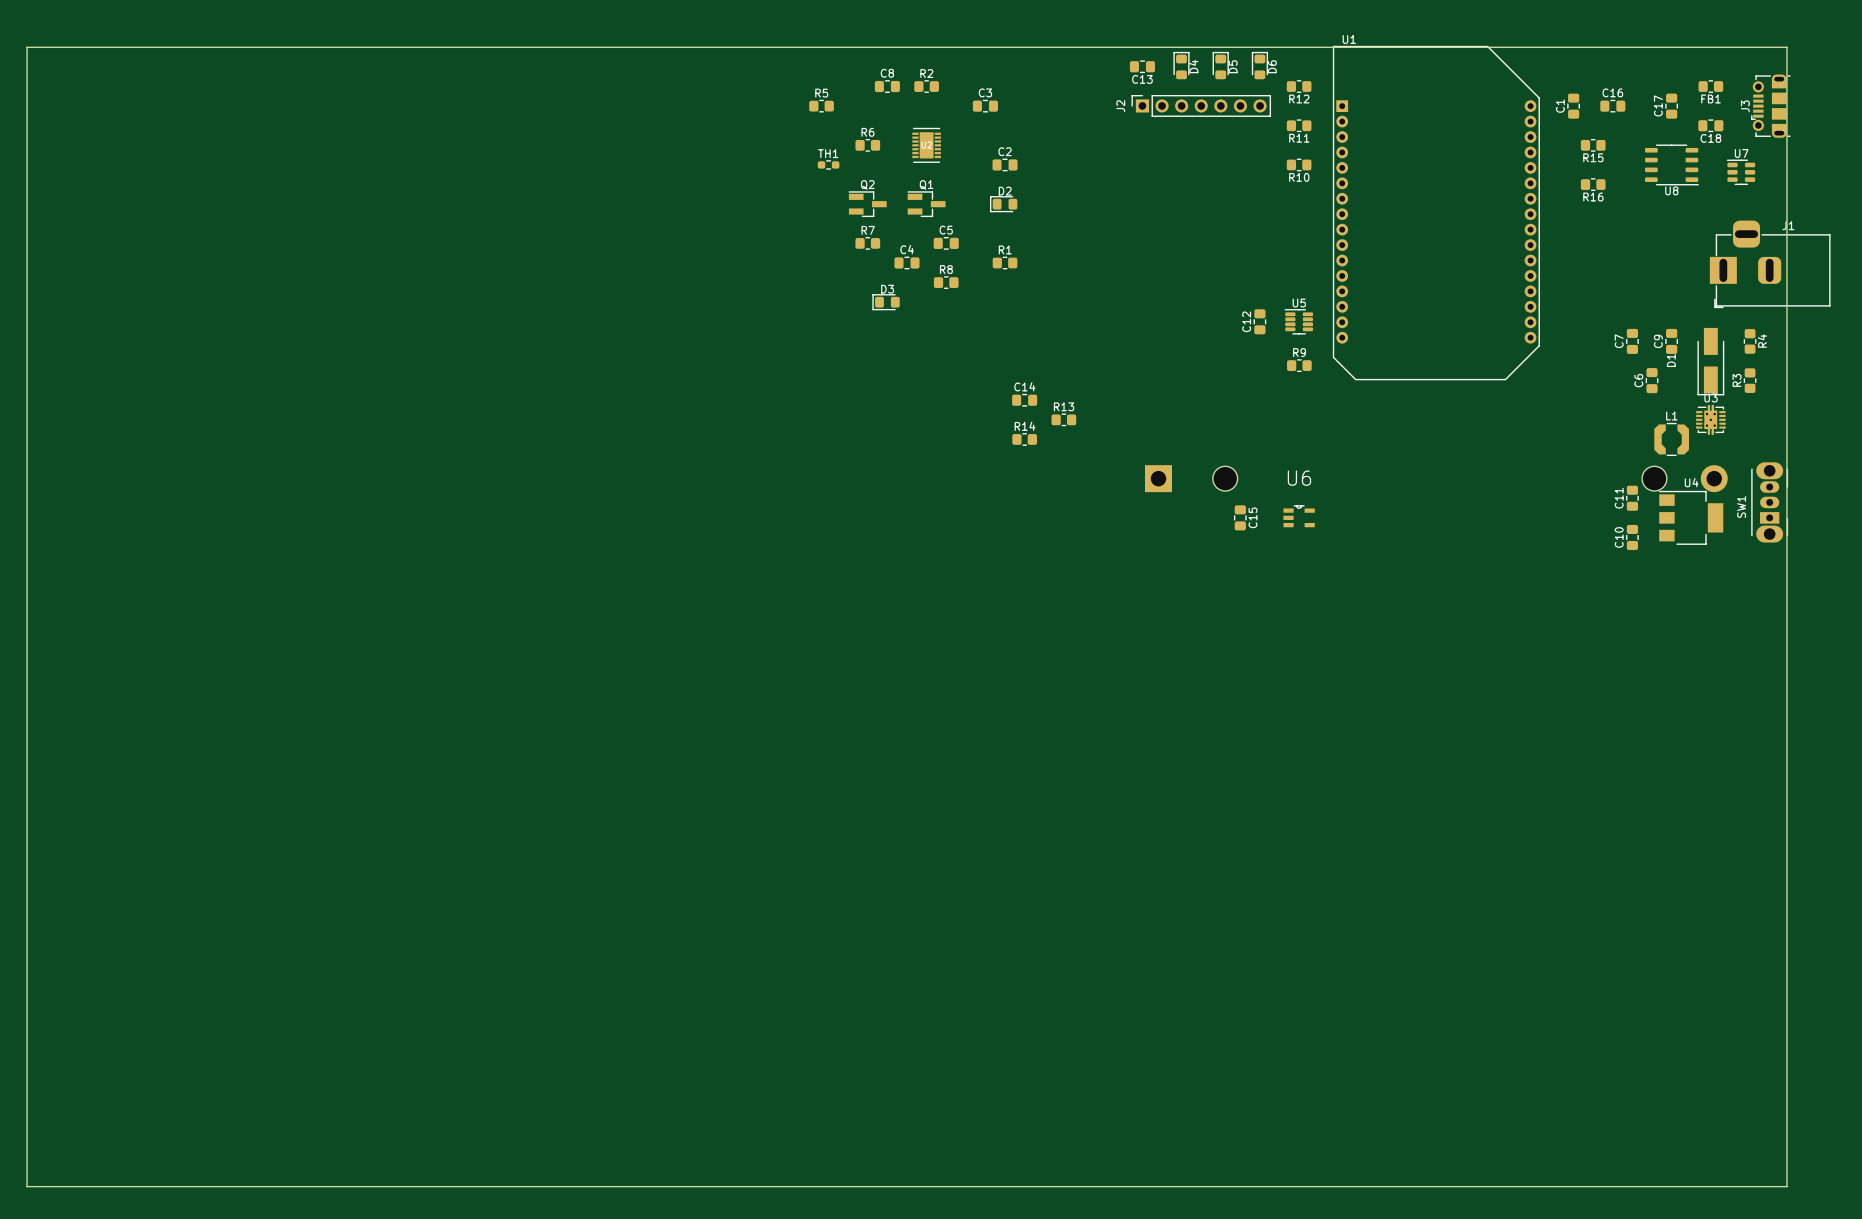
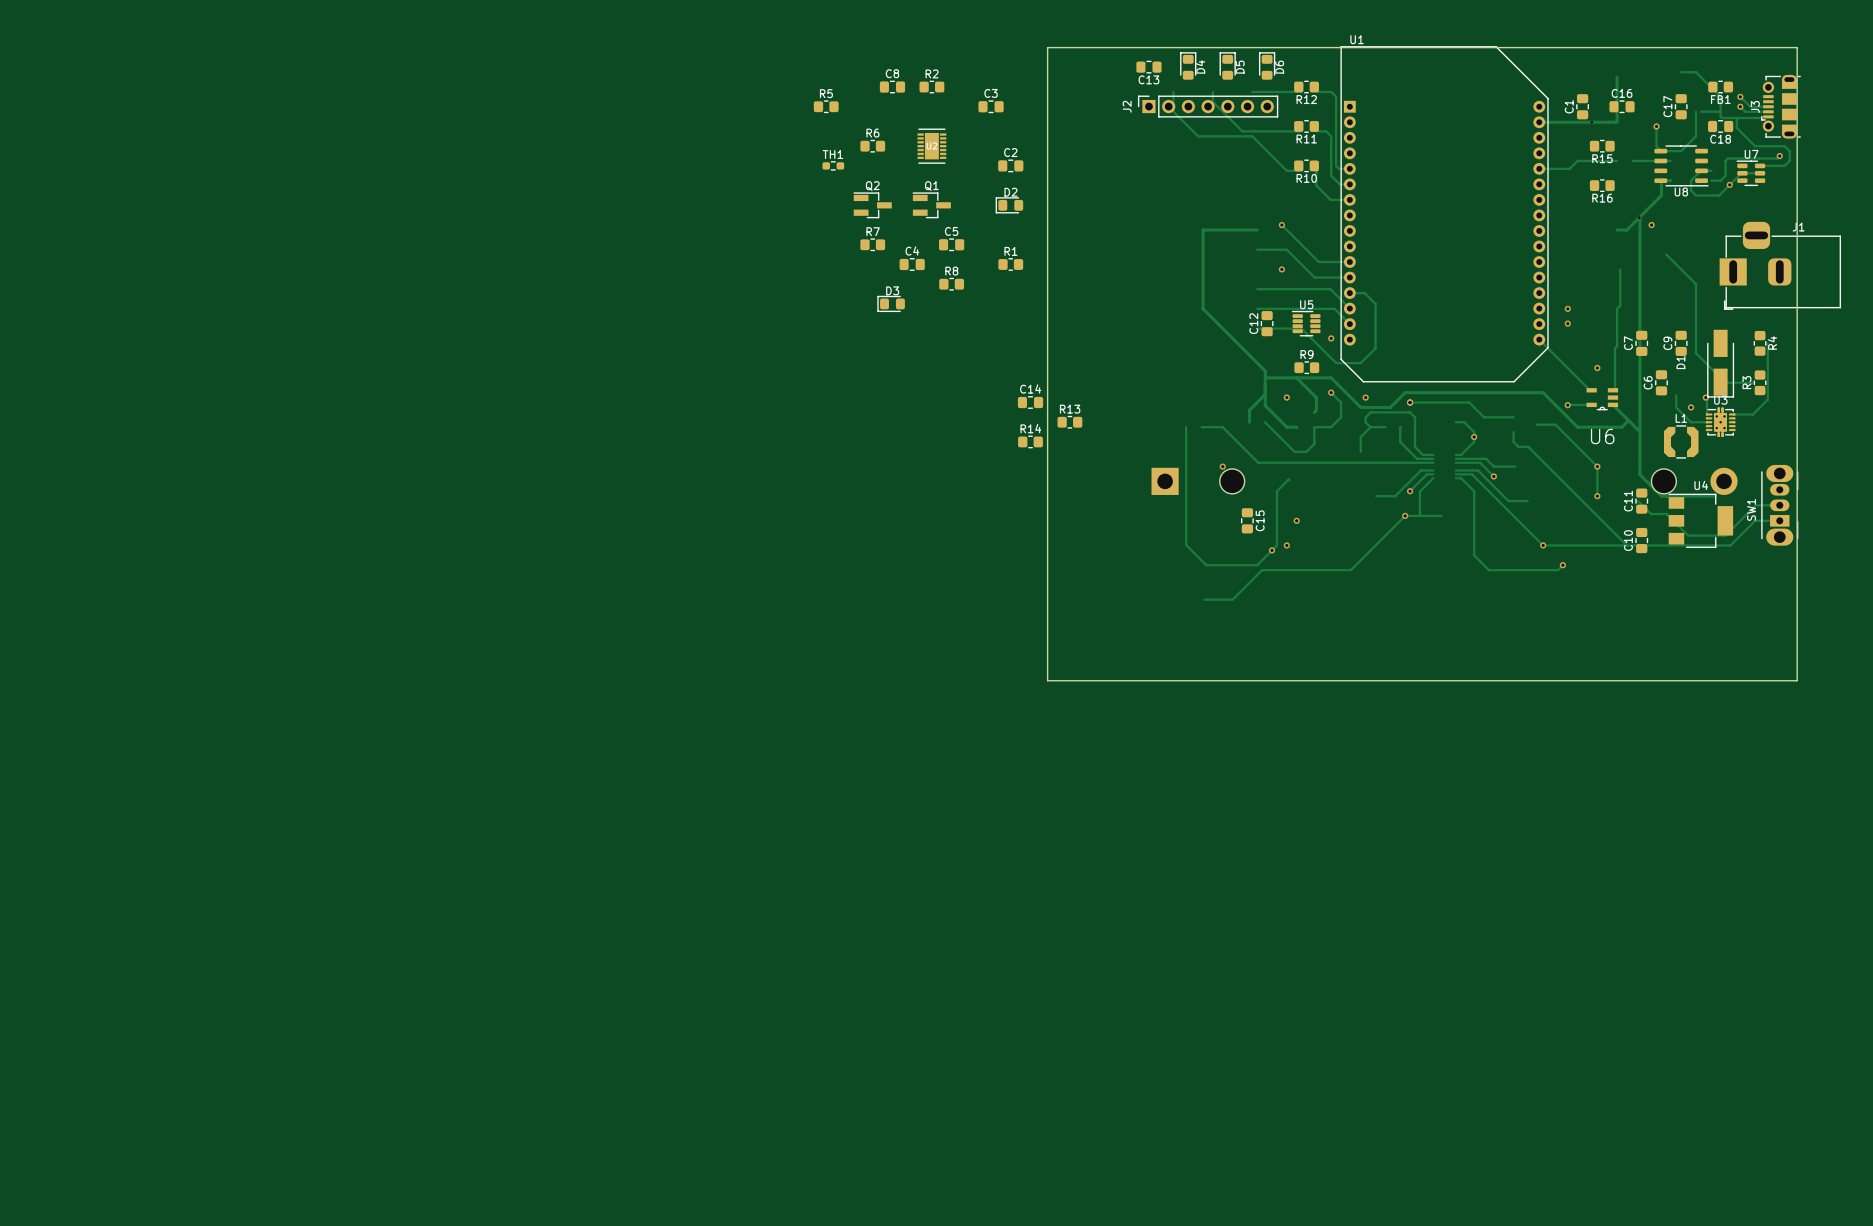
board edge: (1041, 47) (27, 47) (27, 1186) (1786, 1186) (1786, 676) -> (1047, 47) (1047, 680) (1797, 680)
track: none -> (1681, 72) (1695, 72) (1720, 96) (1722, 118) (1760, 118)
track: none -> (1617, 77) (1616, 122) (1539, 122)
track: none -> (1173, 91) (1173, 111) (1198, 136) (1252, 136) (1286, 170) (1301, 170)
track: none -> (1212, 91) (1212, 101) (1242, 131) (1301, 131)
track: none -> (1252, 91) (1301, 91)
track: none -> (1317, 91) (1331, 91) (1336, 96) (1336, 165) (1339, 168) (1349, 168)
track: none -> (1740, 96) (1750, 106) (1768, 106)
via: none -> (1740, 96)
track: none -> (1740, 106) (1745, 111) (1768, 111)
via: none -> (1740, 106)
track: none -> (1695, 111) (1695, 136) (1681, 151) (1661, 151) (1656, 146) (1656, 126)
track: none -> (1700, 111) (1720, 111)
track: none -> (1736, 118) (1736, 127) (1755, 146) (1784, 146) (1789, 151) (1789, 160) (1784, 165) (1759, 165)
via: none -> (1591, 122)
via: none -> (1656, 126)
track: none -> (1317, 131) (1326, 131) (1331, 136) (1331, 175) (1339, 184) (1349, 184)
track: none -> (1779, 156) (1777, 158) (1727, 158) (1725, 160) (1725, 175) (1720, 180) (1711, 180)
via: none -> (1779, 156)
track: none -> (1617, 160) (1577, 160) (1569, 168) (1539, 168)
track: none -> (1632, 160) (1670, 160)
track: none -> (1317, 170) (1316, 185) (1330, 199) (1349, 199)
track: none -> (1711, 170) (1700, 170) (1691, 180) (1691, 190) (1695, 195) (1719, 195) (1741, 173) (1759, 173)
track: none -> (1670, 180) (1661, 180) (1661, 195) (1626, 229) (1617, 229)
via: none -> (1729, 184)
track: none -> (1639, 217) (1639, 474) (1661, 496) (1715, 496)
via: none -> (1639, 217)
track: none -> (1281, 225) (1318, 262) (1349, 262)
via: none -> (1281, 225)
via: none -> (1651, 225)
track: none -> (1257, 229) (1203, 229) (1203, 308) (1265, 371) (1265, 405) (1286, 427) (1296, 427)
track: none -> (1257, 249) (1286, 249) (1314, 277) (1349, 277)
track: none -> (1666, 254) (1695, 284) (1695, 353) (1725, 382) (1752, 382)
via: none -> (1281, 269)
track: none -> (1620, 269) (1620, 305) (1617, 308) (1615, 388) (1612, 390)
track: none -> (1257, 289) (1330, 289) (1349, 308)
track: none -> (1349, 293) (1364, 293) (1375, 303) (1375, 348) (1360, 363) (1336, 363) (1301, 328) (1257, 328)
track: none -> (1257, 308) (1334, 308) (1349, 324)
via: none -> (1567, 308)
via: none -> (1567, 323)
via: none -> (1331, 338)
track: none -> (1539, 339) (1591, 390)
track: none -> (1767, 343) (1767, 399) (1753, 414) (1734, 414)
via: none -> (1597, 368)
track: none -> (1265, 377) (1331, 377) (1360, 407) (1390, 407) (1405, 392) (1543, 392) (1577, 427) (1622, 427) (1628, 420)
track: none -> (1296, 377) (1316, 397) (1316, 410) (1314, 412)
track: none -> (1331, 392) (1341, 402) (1341, 417) (1331, 427) (1314, 427) (1314, 444) (1306, 451) (1294, 451) (1265, 422)
via: none -> (1331, 392)
track: none -> (1265, 394) (1249, 410) (1249, 422)
track: none -> (1676, 395) (1676, 407) (1691, 422) (1706, 422)
via: none -> (1286, 397)
via: none -> (1365, 397)
track: none -> (1705, 397) (1706, 414)
via: none -> (1705, 397)
track: none -> (1410, 402) (1469, 402) (1484, 417) (1513, 417)
via: none -> (1410, 402)
via: none -> (1567, 405)
track: none -> (1591, 404) (1567, 405)
track: none -> (1612, 404) (1639, 431)
via: none -> (1691, 407)
track: none -> (1455, 422) (1464, 422) (1474, 432) (1474, 441) (1461, 454) (1455, 454)
track: none -> (1536, 424) (1555, 424) (1597, 466) (1597, 496)
track: none -> (1186, 427) (1186, 545) (1206, 565) (1257, 565) (1276, 545) (1276, 491) (1289, 479)
track: none -> (1201, 427) (1222, 427) (1258, 462) (1433, 462)
track: none -> (1370, 427) (1385, 427)
track: none -> (1370, 427) (1360, 437) (1360, 451)
track: none -> (1370, 427) (1365, 422) (1365, 417) (1370, 412) (1410, 412) (1414, 417) (1414, 446) (1423, 454) (1433, 454)
track: none -> (1400, 427) (1400, 441) (1417, 458) (1433, 458)
track: none -> (1513, 432) (1513, 441) (1518, 446) (1528, 446) (1626, 545)
via: none -> (1474, 437)
track: none -> (1455, 458) (1486, 458) (1493, 466) (1515, 466)
track: none -> (1455, 462) (1480, 462) (1493, 476)
via: none -> (1222, 466)
via: none -> (1597, 466)
track: none -> (1433, 470) (1420, 470) (1395, 496) (1376, 496)
track: none -> (1455, 470) (1478, 470) (1508, 501) (1527, 501)
track: none -> (1433, 474) (1426, 474) (1410, 491)
track: none -> (1455, 474) (1472, 474) (1543, 545) (1730, 545) (1755, 520) (1779, 520)
via: none -> (1493, 476)
track: none -> (1433, 478) (1419, 491) (1419, 515)
track: none -> (1455, 478) (1461, 478) (1474, 491) (1474, 555) (1488, 570) (1557, 570) (1562, 565)
via: none -> (1410, 491)
via: none -> (1597, 496)
track: none -> (1638, 501) (1651, 514) (1666, 514) (1688, 535) (1725, 535) (1755, 505) (1779, 505)
via: none -> (1405, 515)
track: none -> (1441, 515) (1405, 515) (1350, 570) (1262, 570) (1232, 599) (1204, 599)
U6 rotation: 0° (1299, 516) -> 180° (1602, 399)
U6 position: (1299, 516) -> (1602, 399)
via: none -> (1296, 520)
via: none -> (1286, 545)
via: none -> (1543, 545)
via: none -> (1272, 550)
via: none -> (1562, 565)

